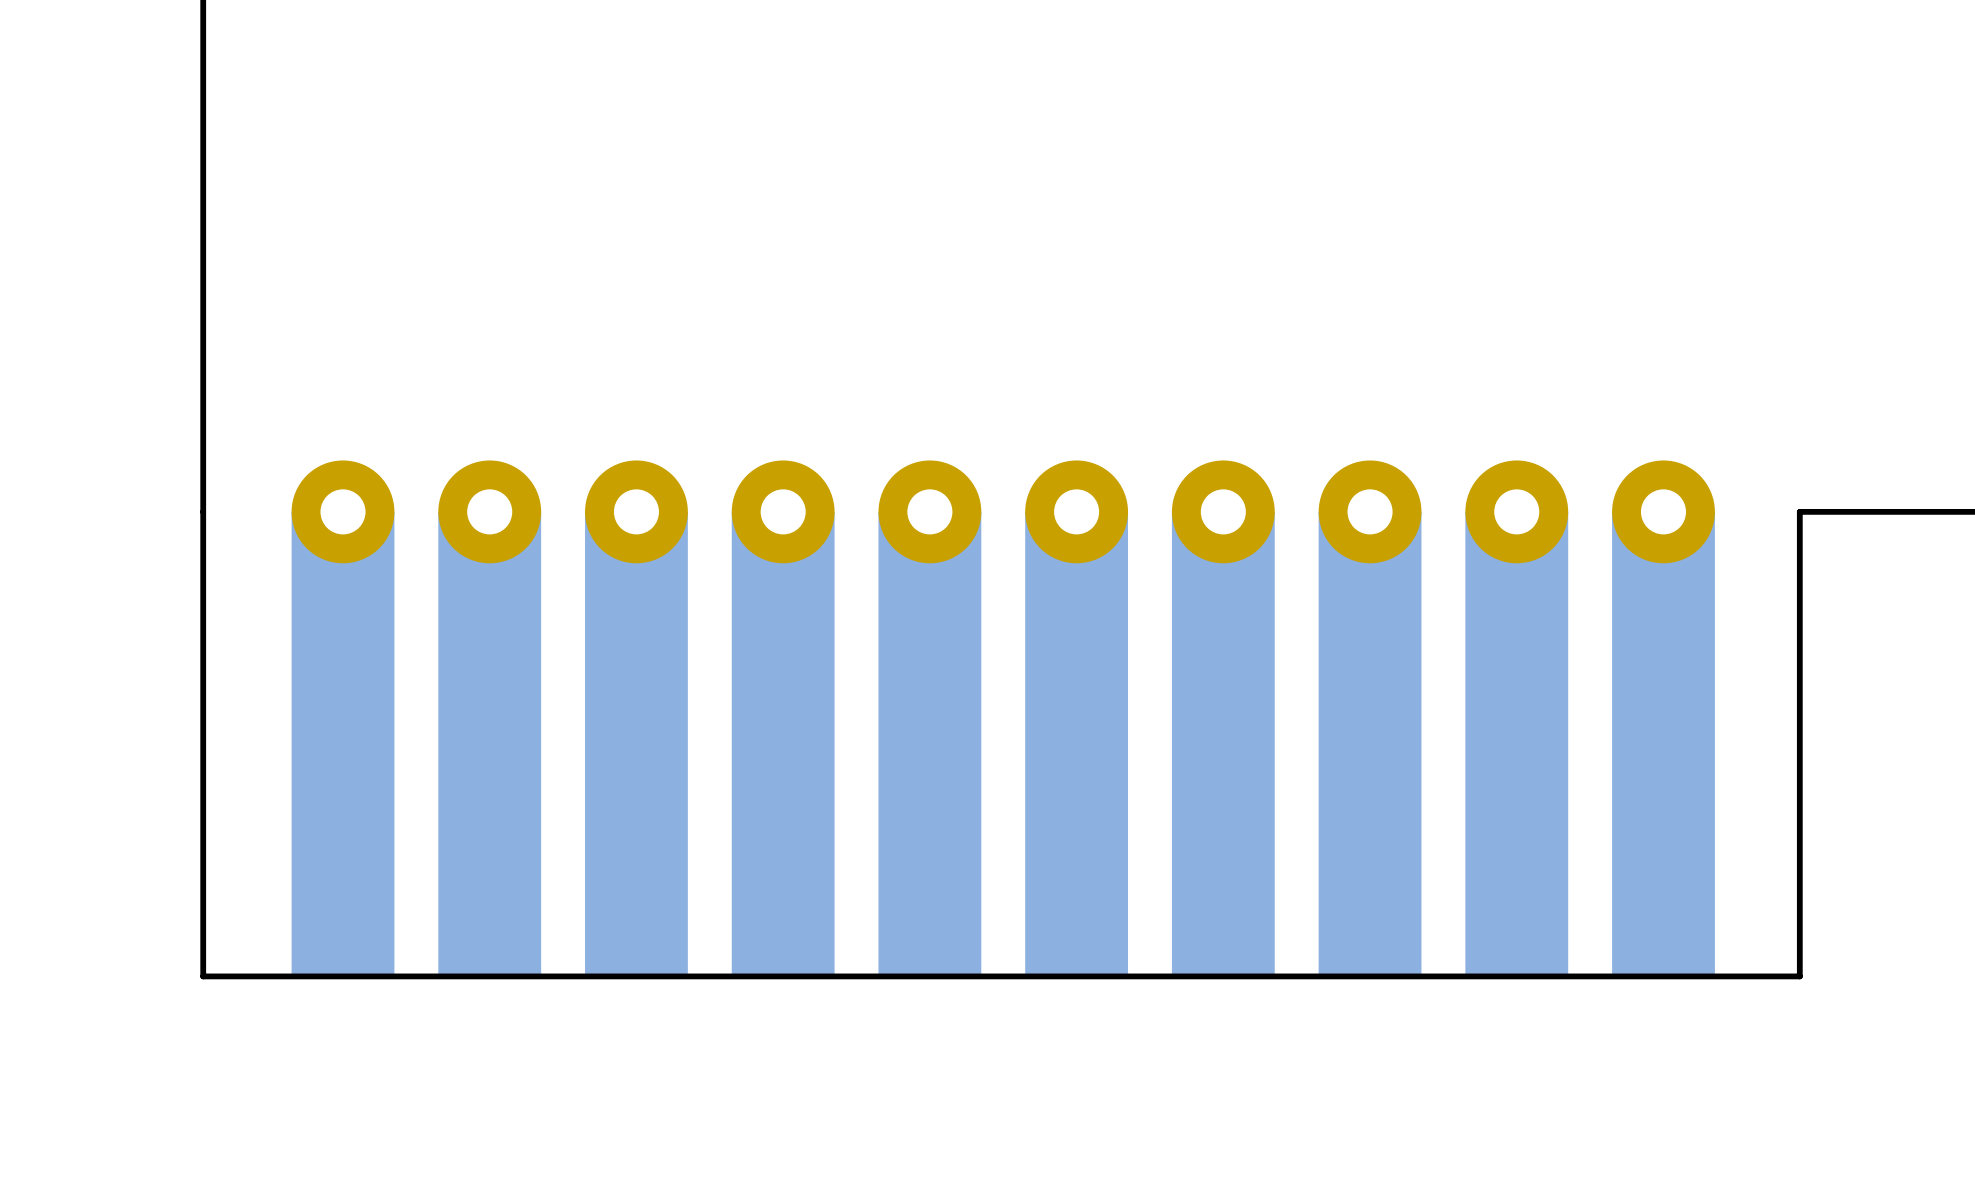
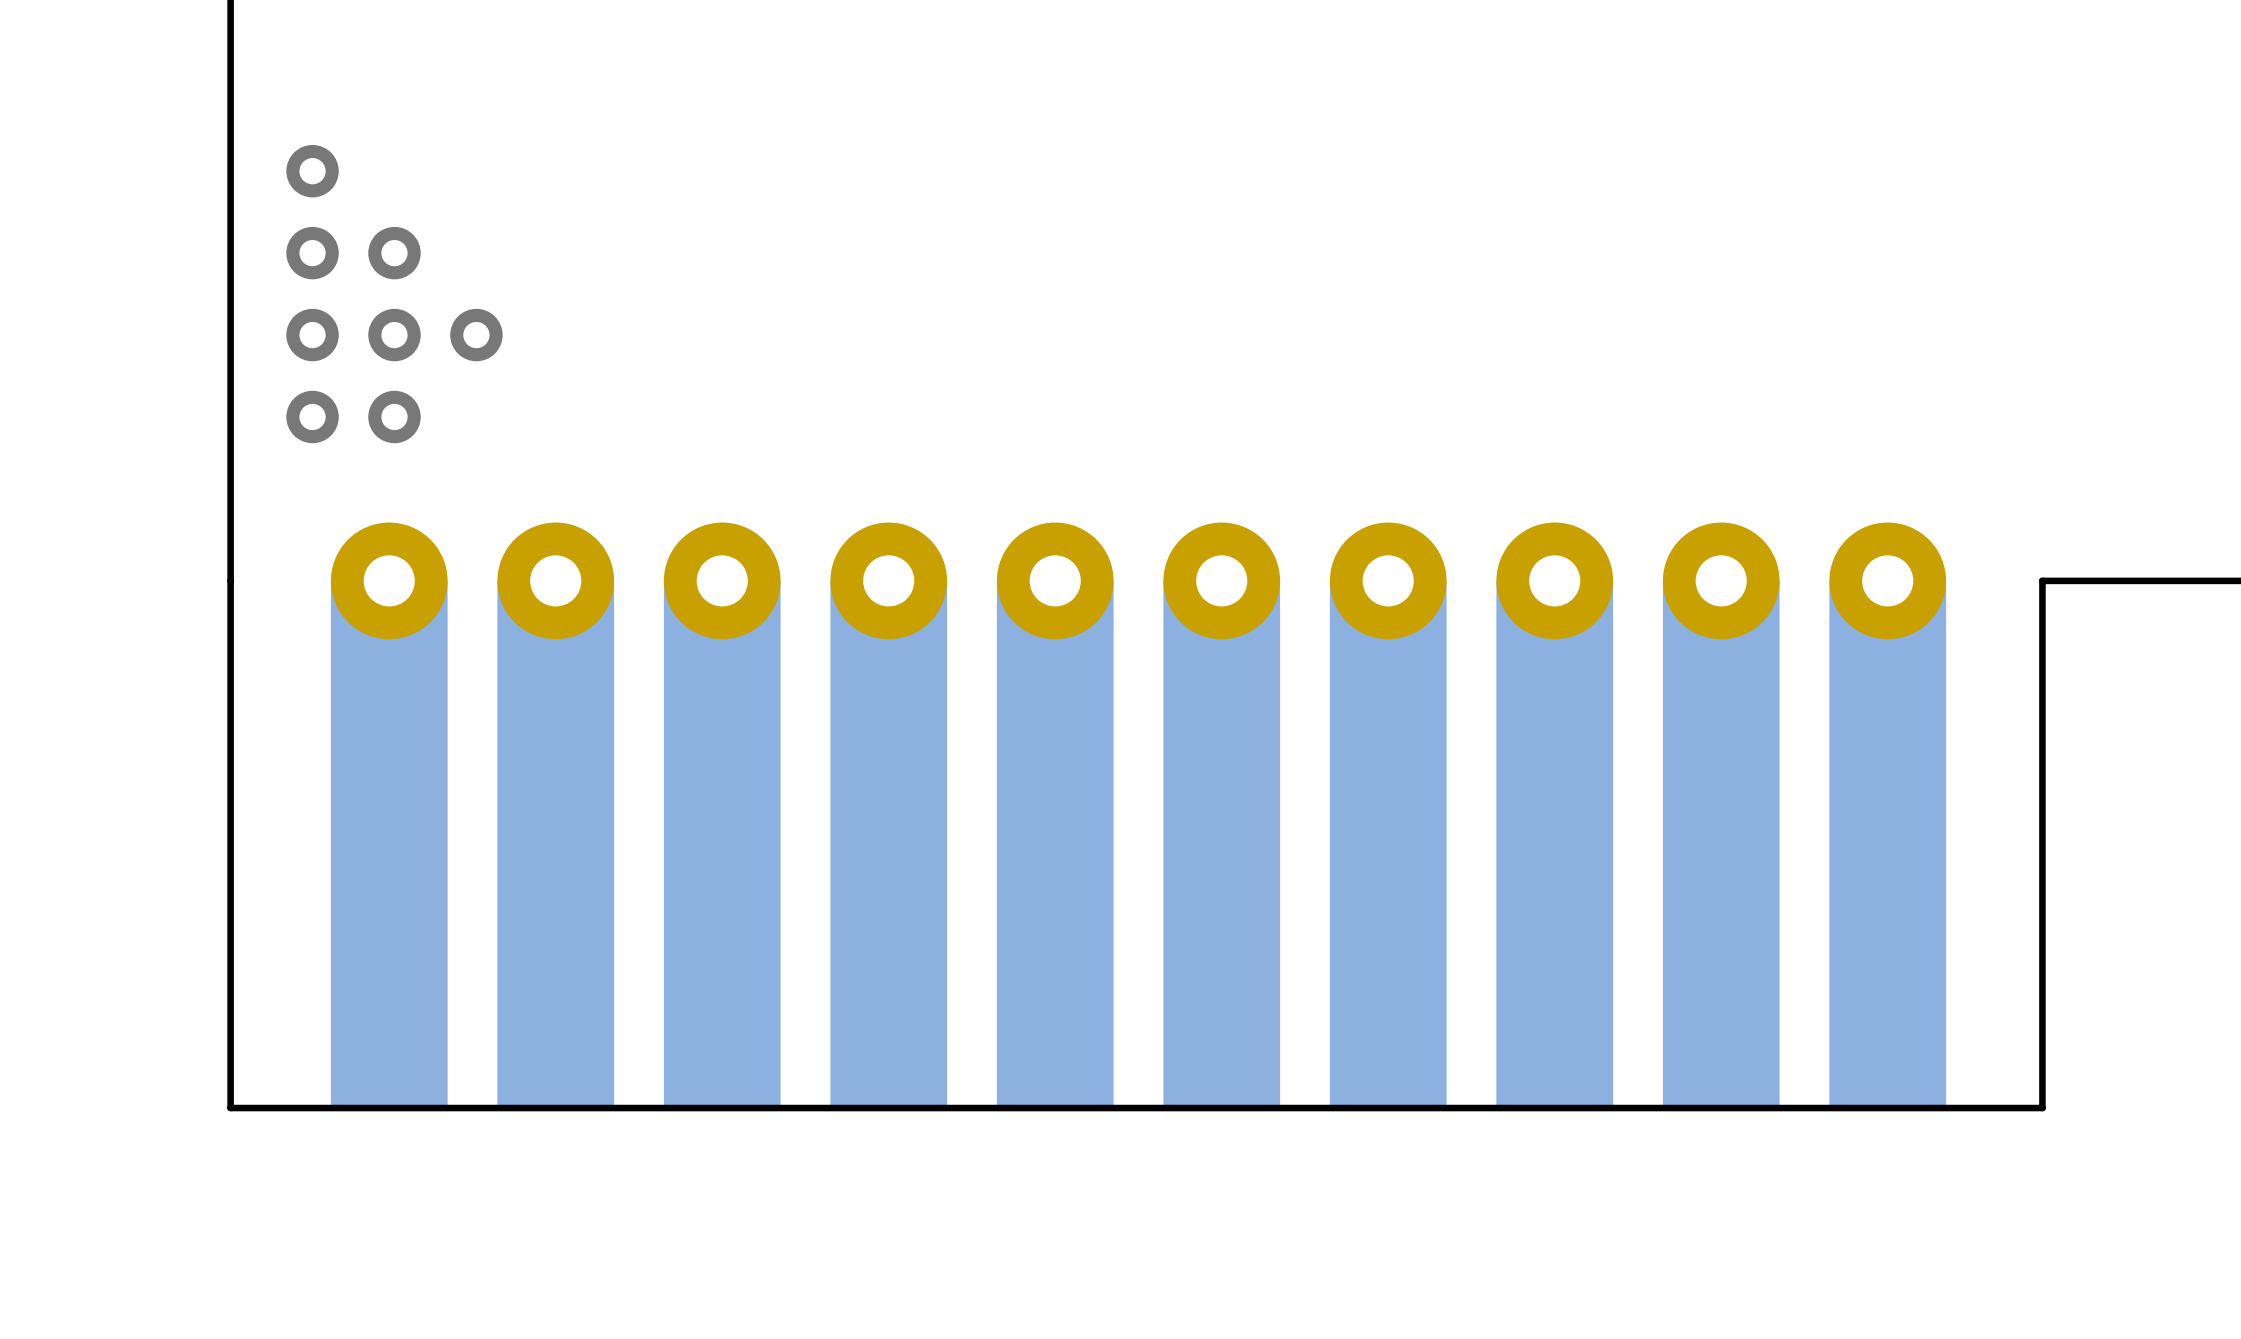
via: none -> (312, 171)
via: none -> (312, 253)
via: none -> (394, 253)
via: none -> (312, 335)
via: none -> (394, 335)
via: none -> (476, 335)
via: none -> (312, 417)
via: none -> (394, 417)

